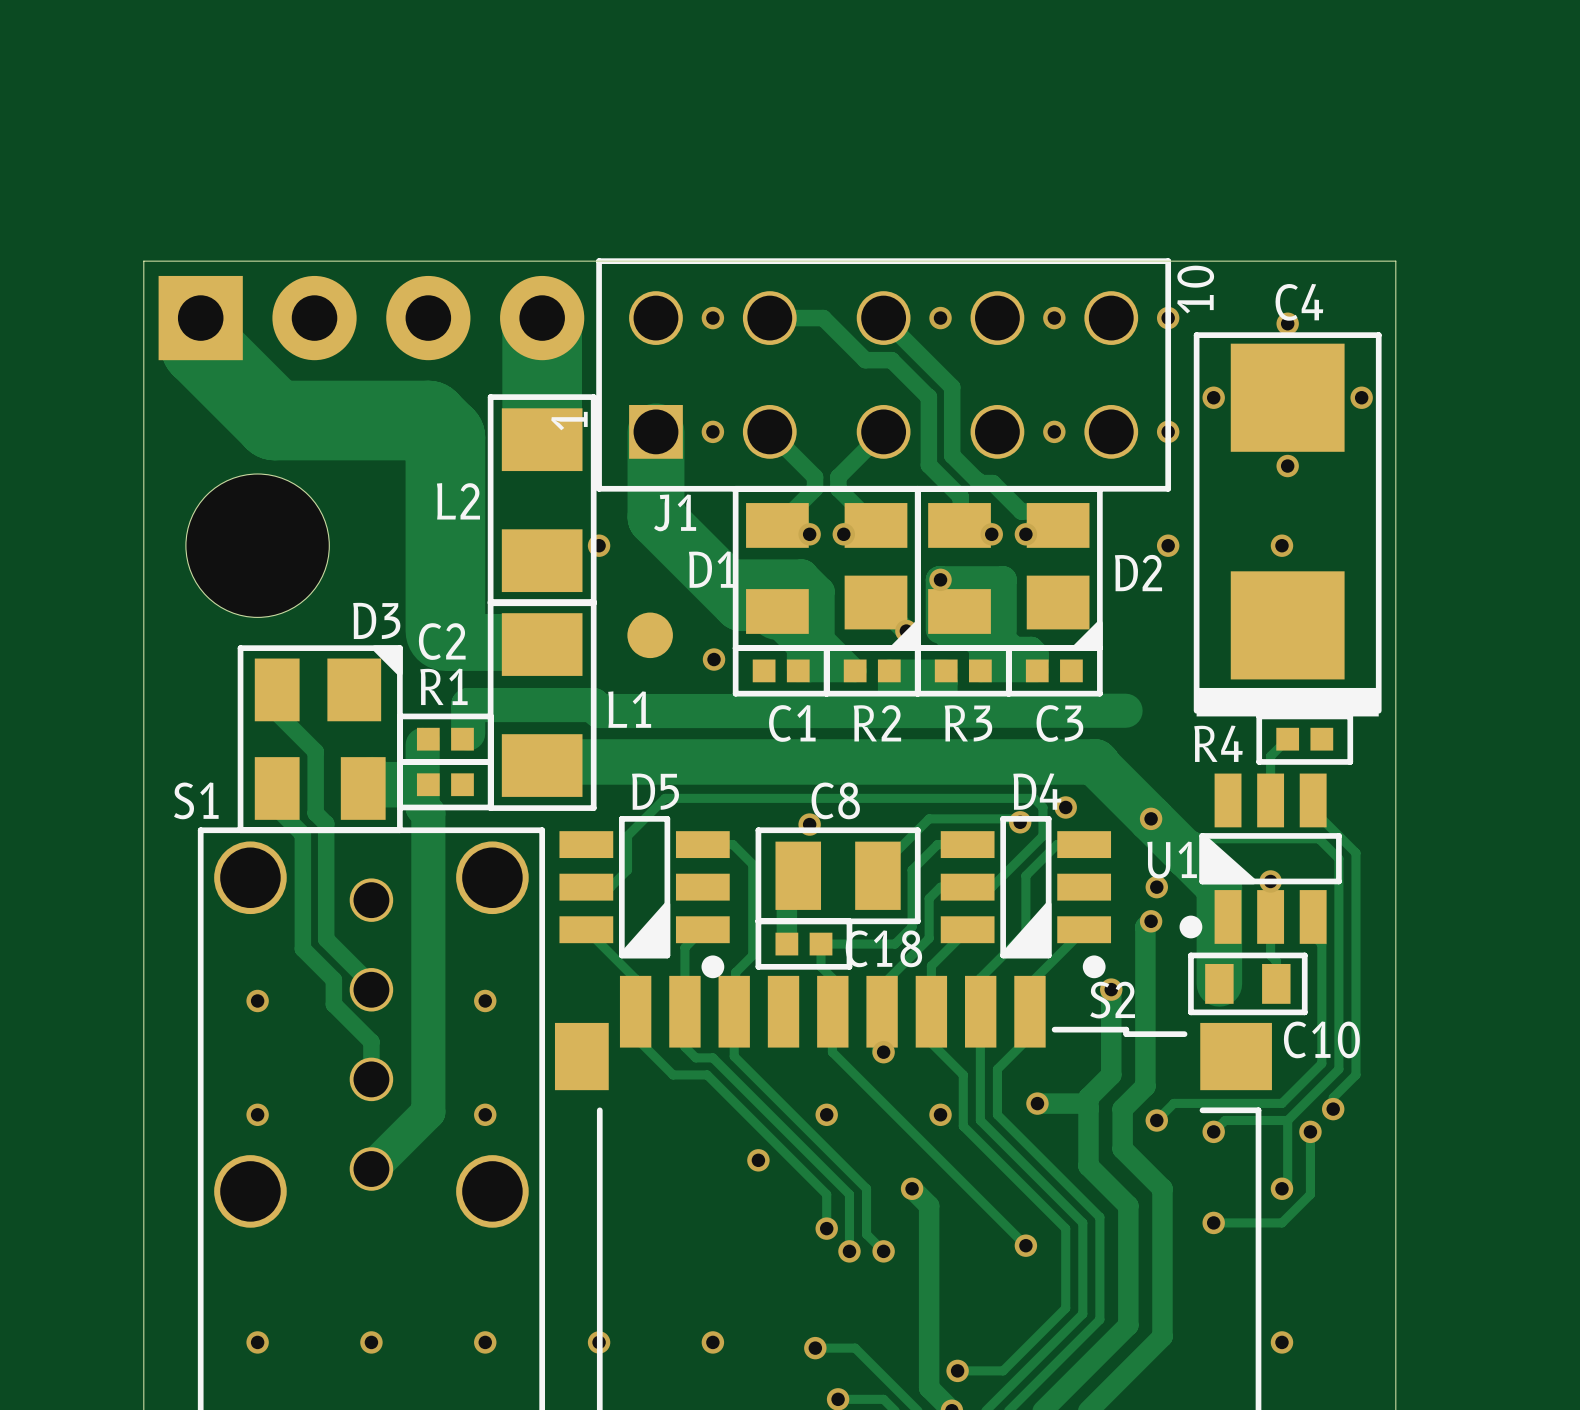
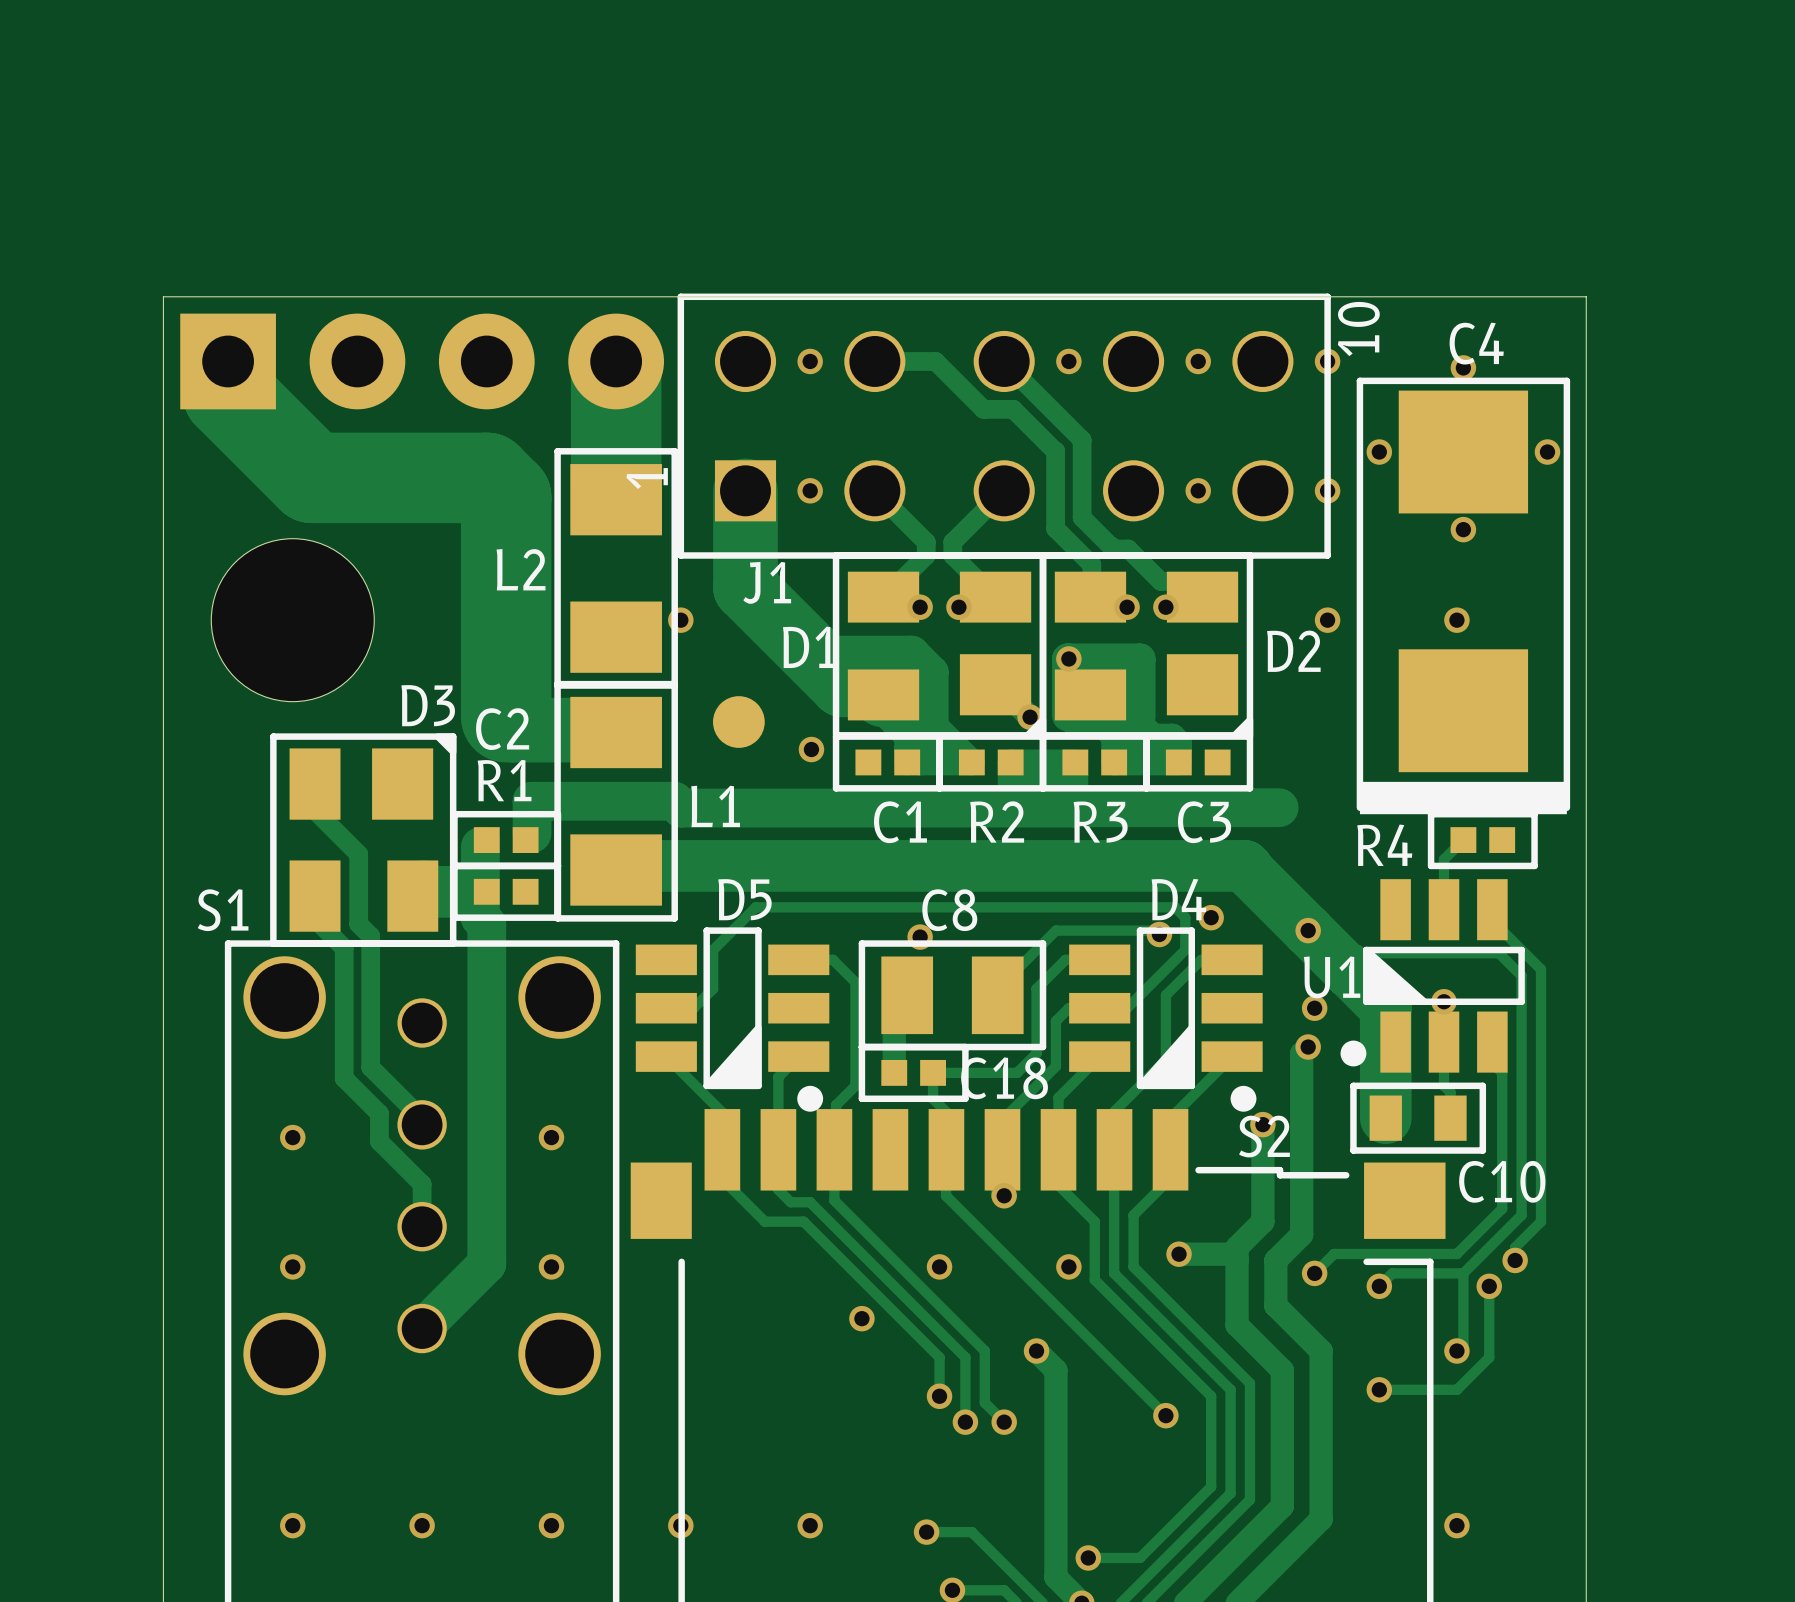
D1 footprint: [732, 485, 921, 651] -> [832, 552, 1047, 739]
D2 footprint: [914, 485, 1103, 651] -> [1039, 552, 1254, 739]
D3 footprint: [237, 645, 403, 834] -> [270, 733, 457, 947]

